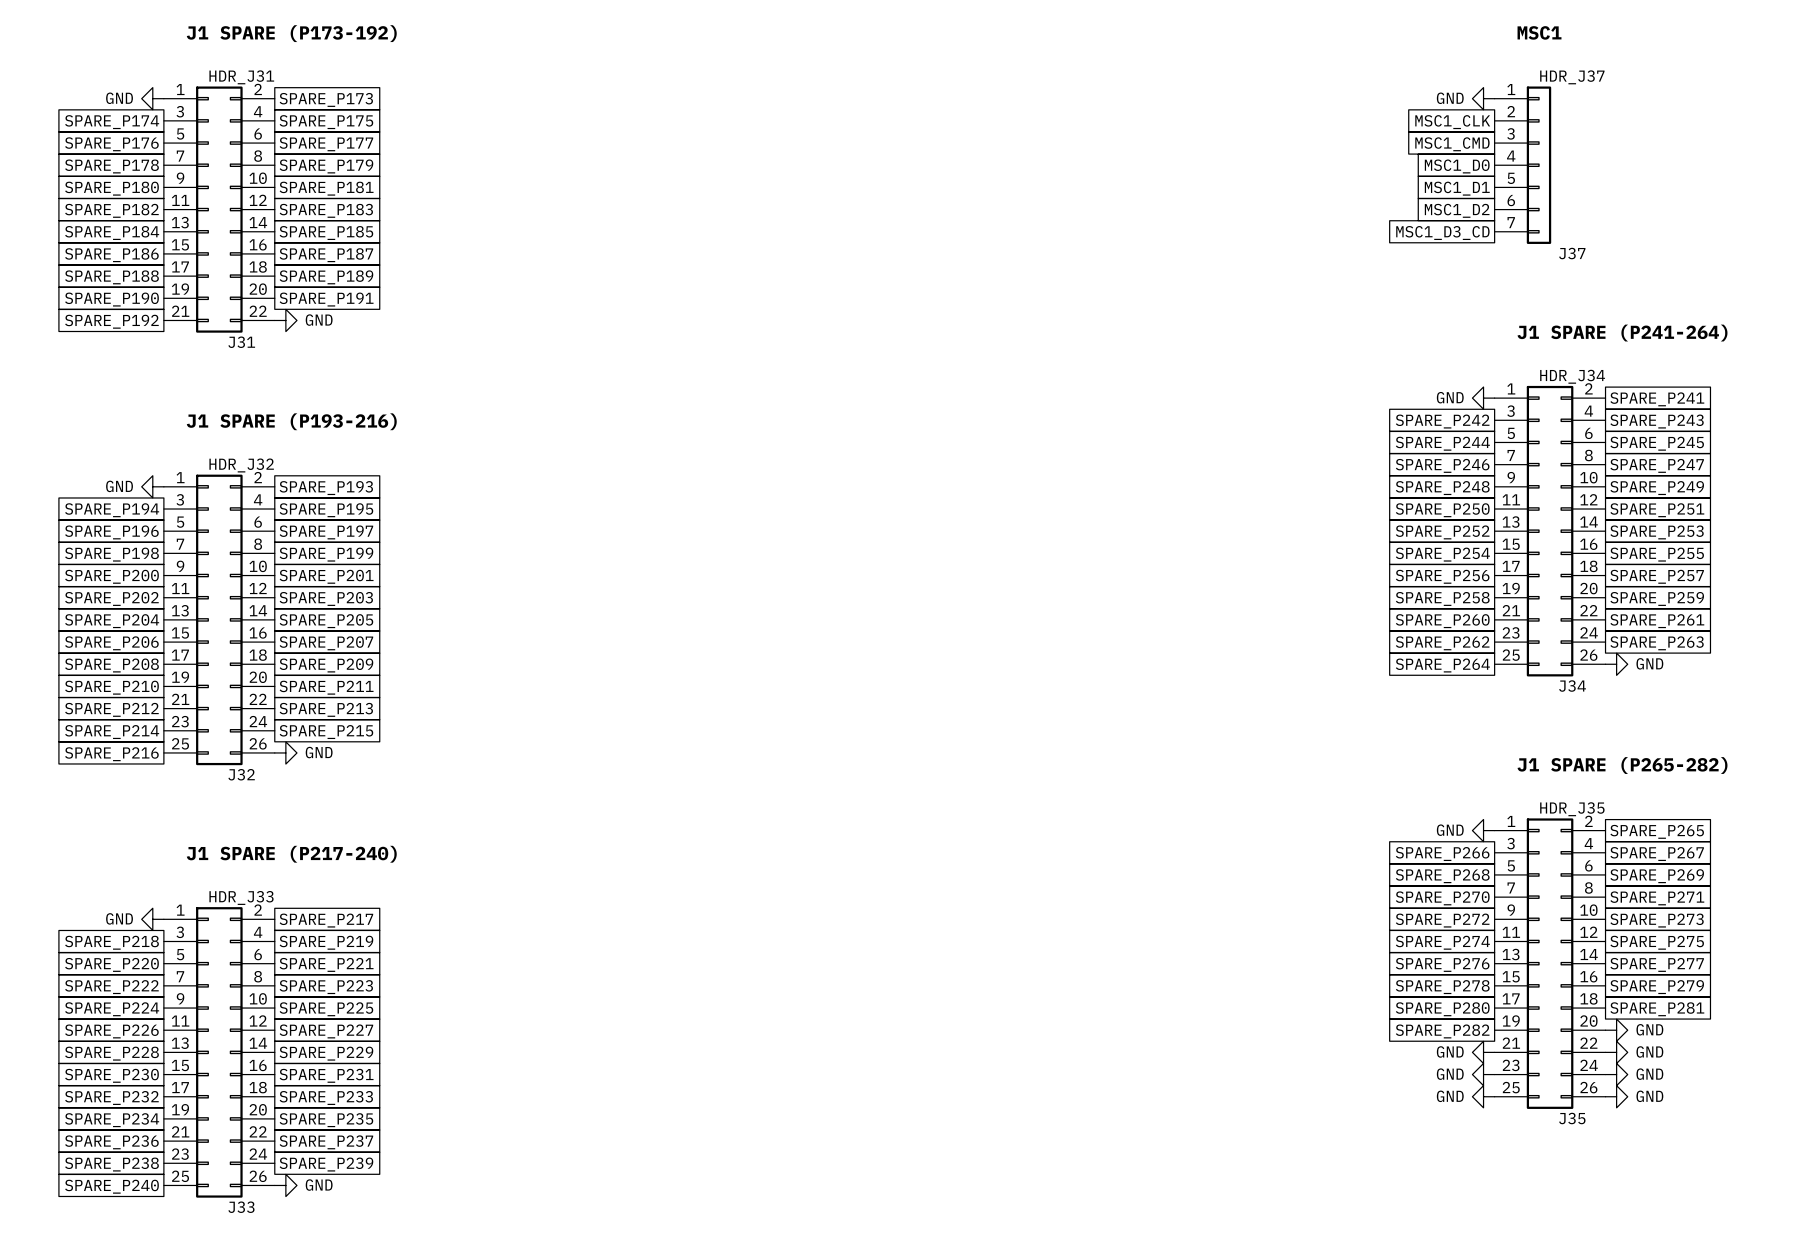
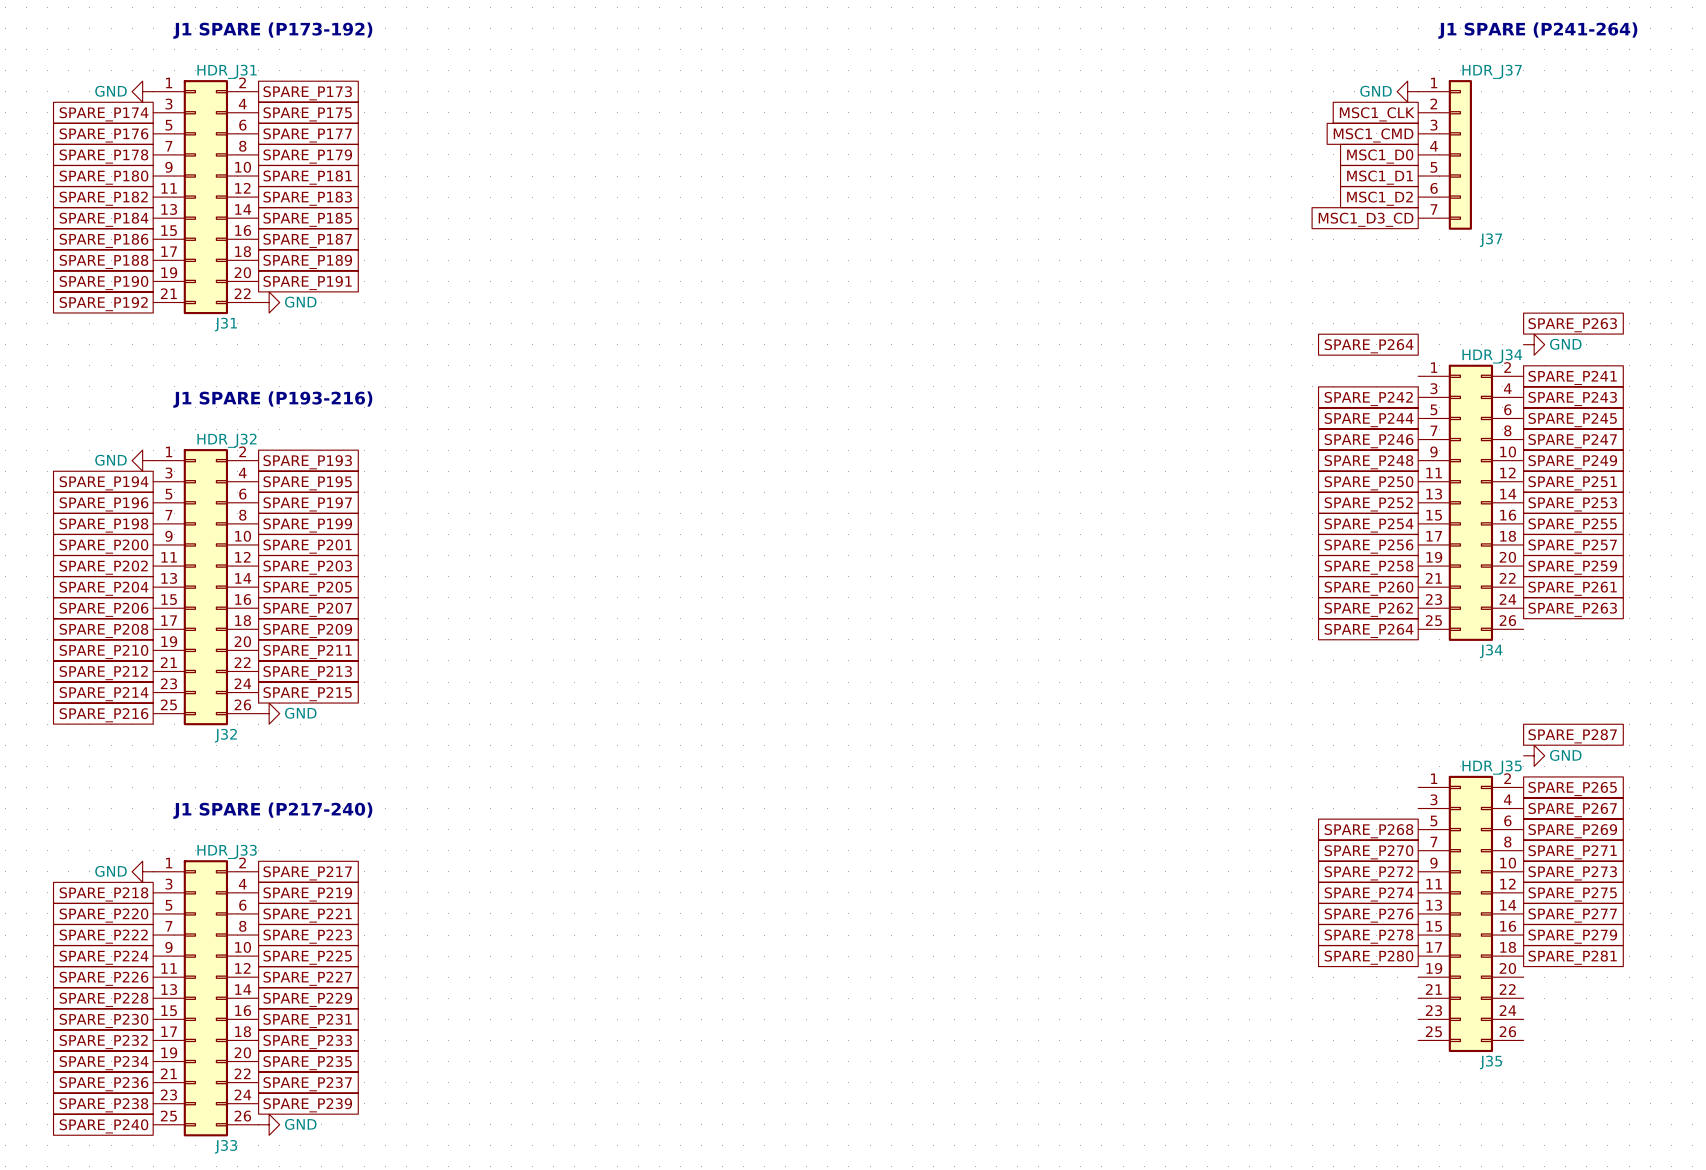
text: MSC1 (1539, 32) -> J1 SPARE (P241-264) (1537, 30)
text: J1 SPARE (P241-264) (1622, 333) -> none
global label: none -> SPARE_P263 (1572, 325)
global label: none -> SPARE_P264 (1369, 346)
power symbol rotation: 0° (1483, 398) -> 180° (1534, 344)
power symbol position: GND (1483, 398) -> GND (1534, 344)
power symbol: GND (1616, 664) -> none
text: J1 SPARE (P265-282) (1622, 765) -> none
global label: none -> SPARE_P287 (1572, 736)
power symbol: none -> GND (1534, 755)
power symbol: GND (1483, 830) -> none
global label: SPARE_P266 (1442, 854) -> none
power symbol: GND (1616, 1030) -> none
global label: SPARE_P282 (1442, 1031) -> none
power symbol: GND (1483, 1052) -> none
power symbol: GND (1616, 1052) -> none
power symbol: GND (1483, 1074) -> none
power symbol: GND (1616, 1074) -> none
power symbol: GND (1483, 1096) -> none
power symbol: GND (1616, 1096) -> none

